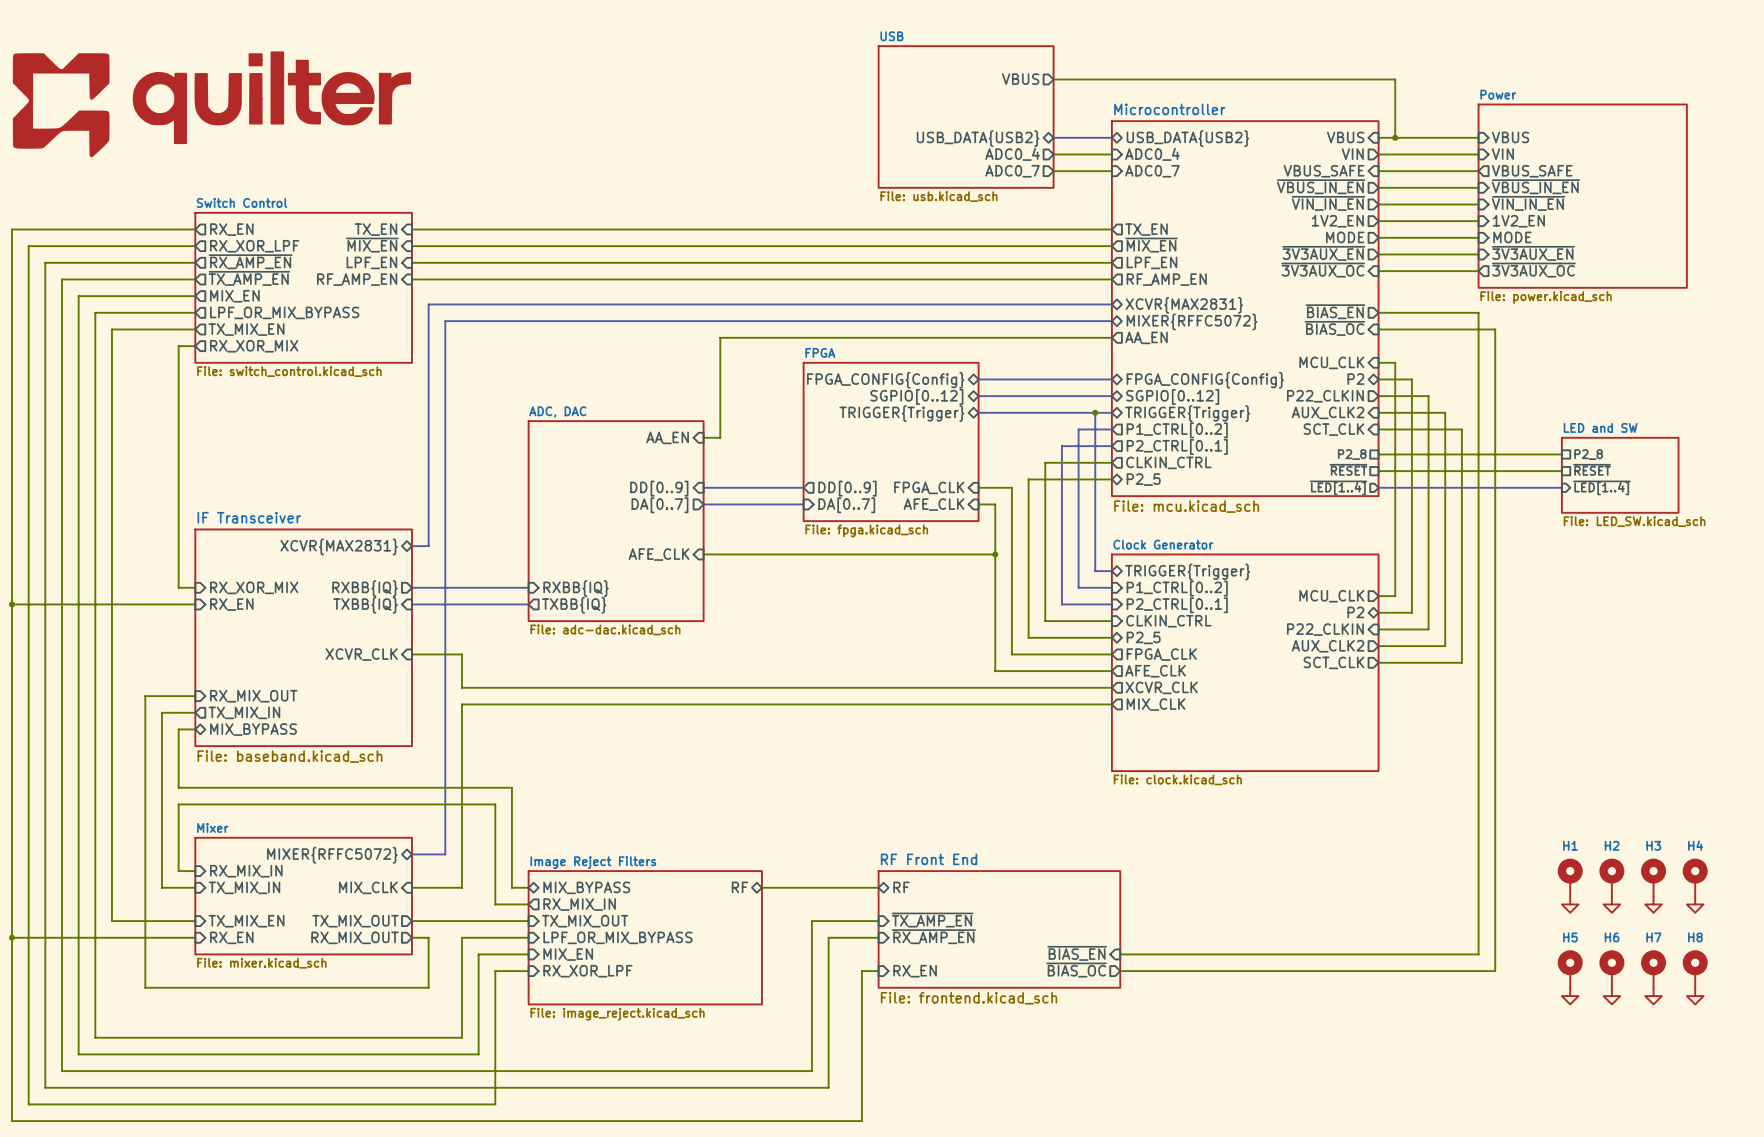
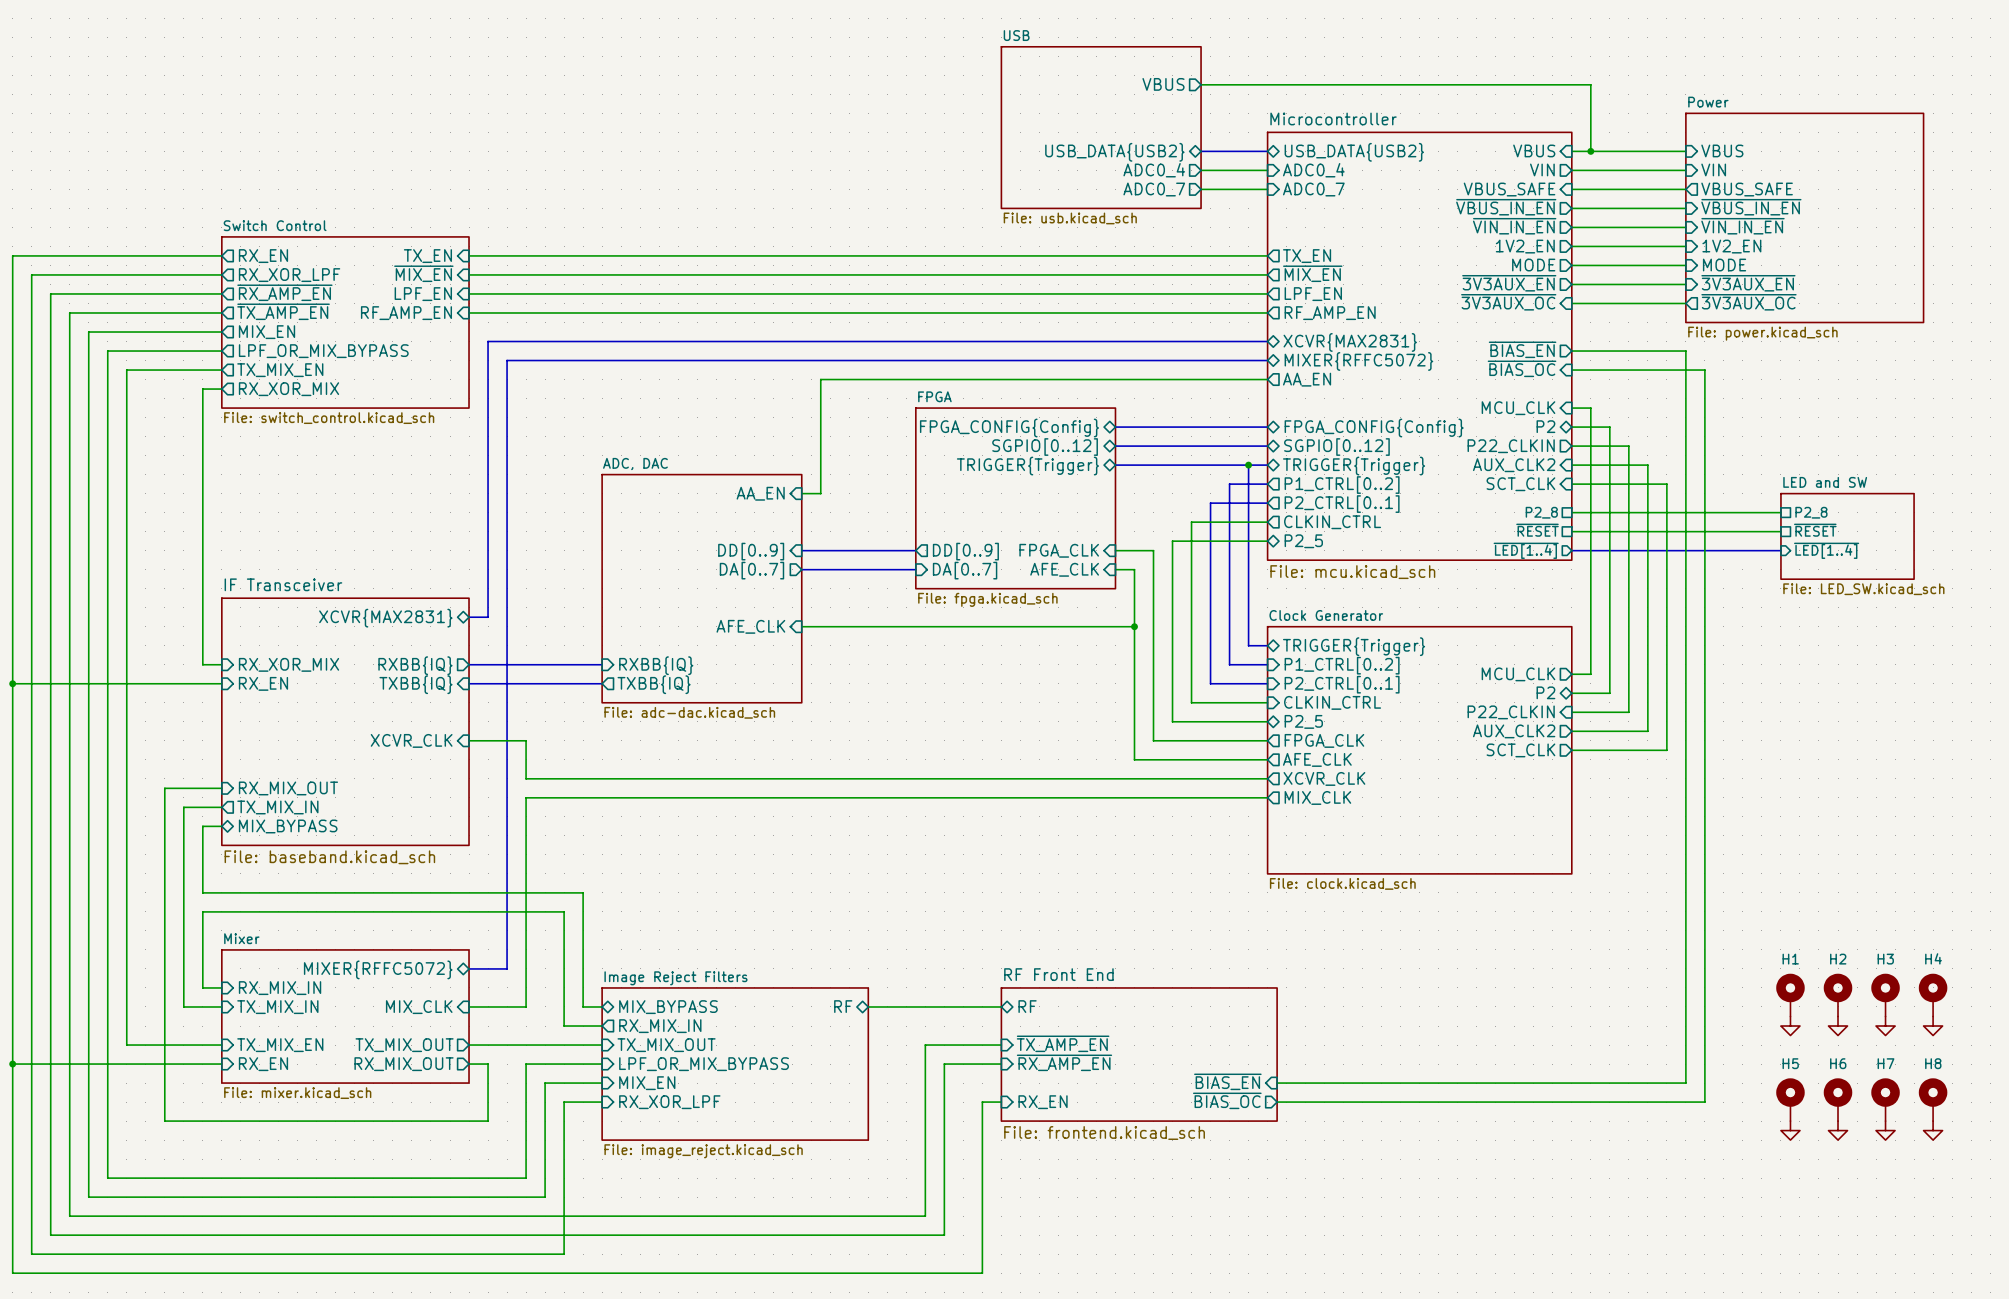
power symbol: (211, 104) -> none

